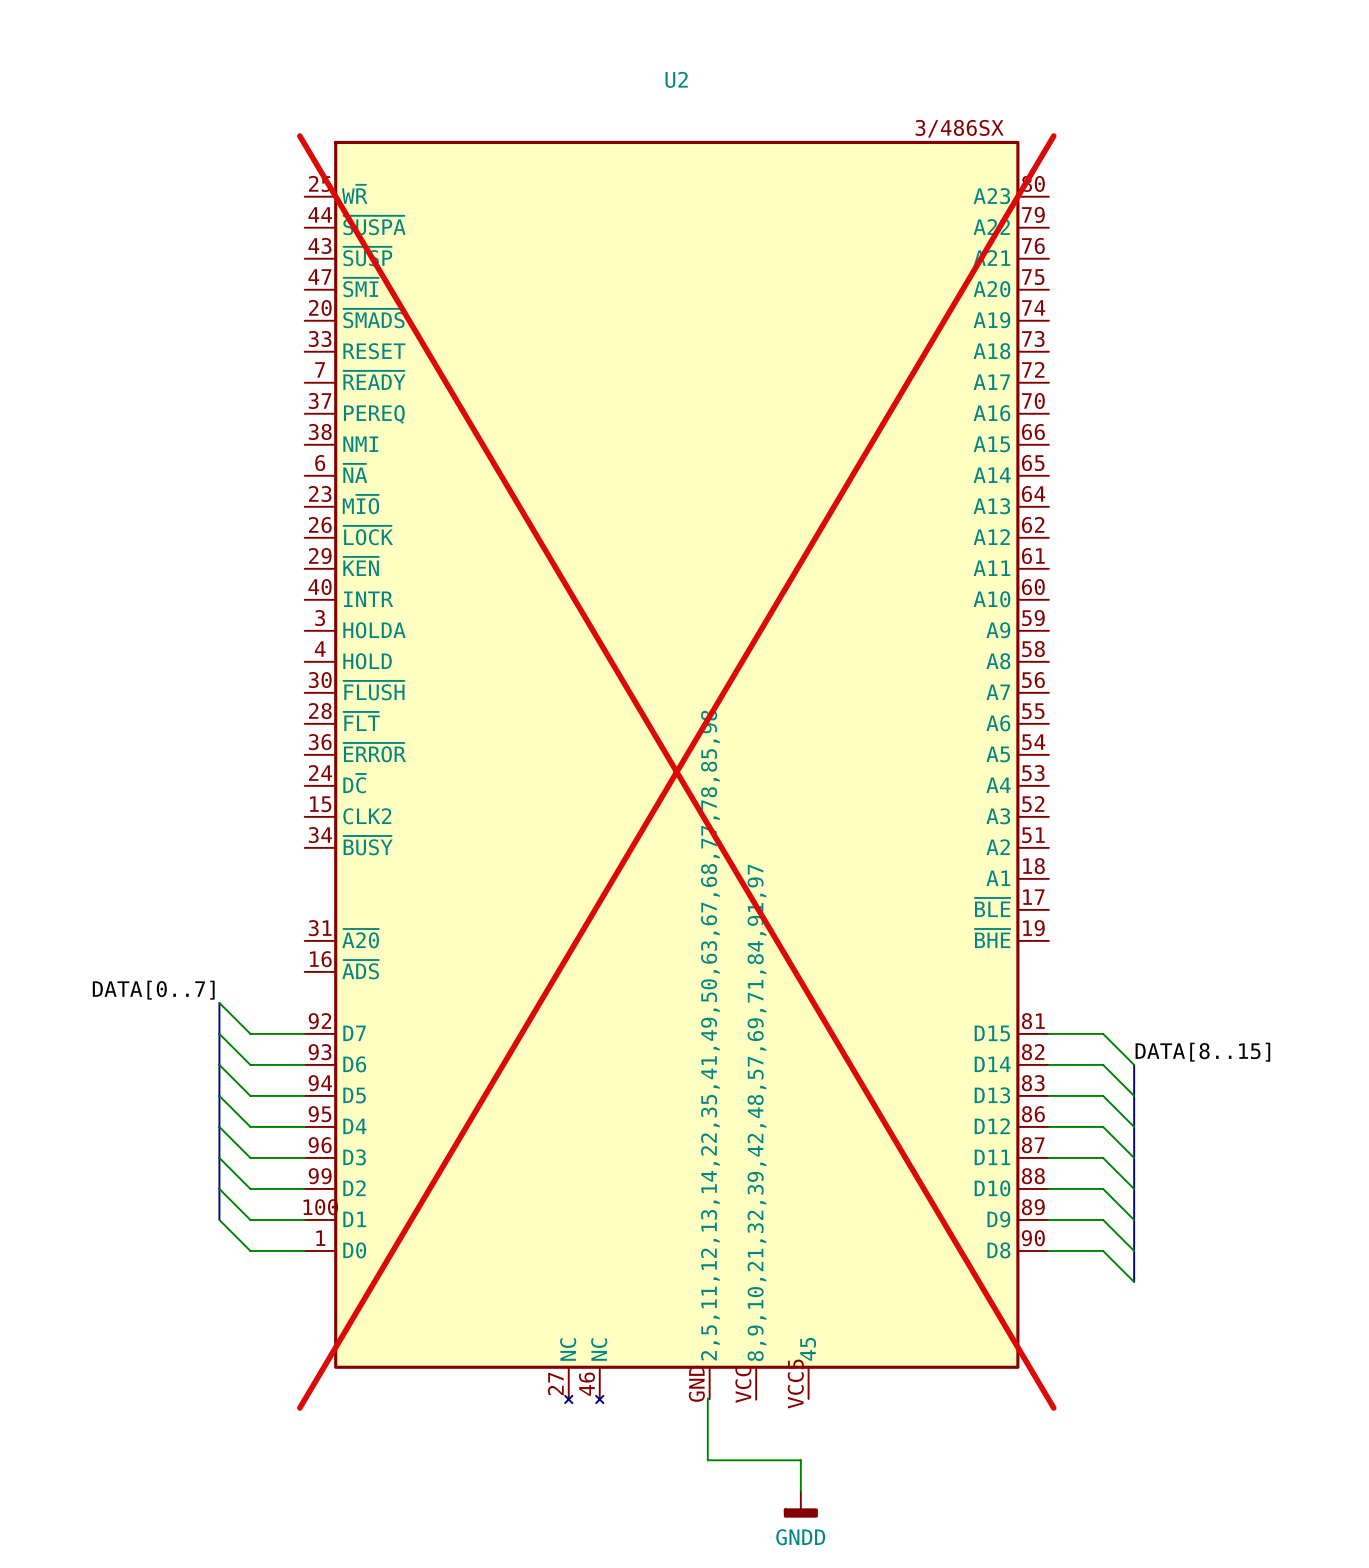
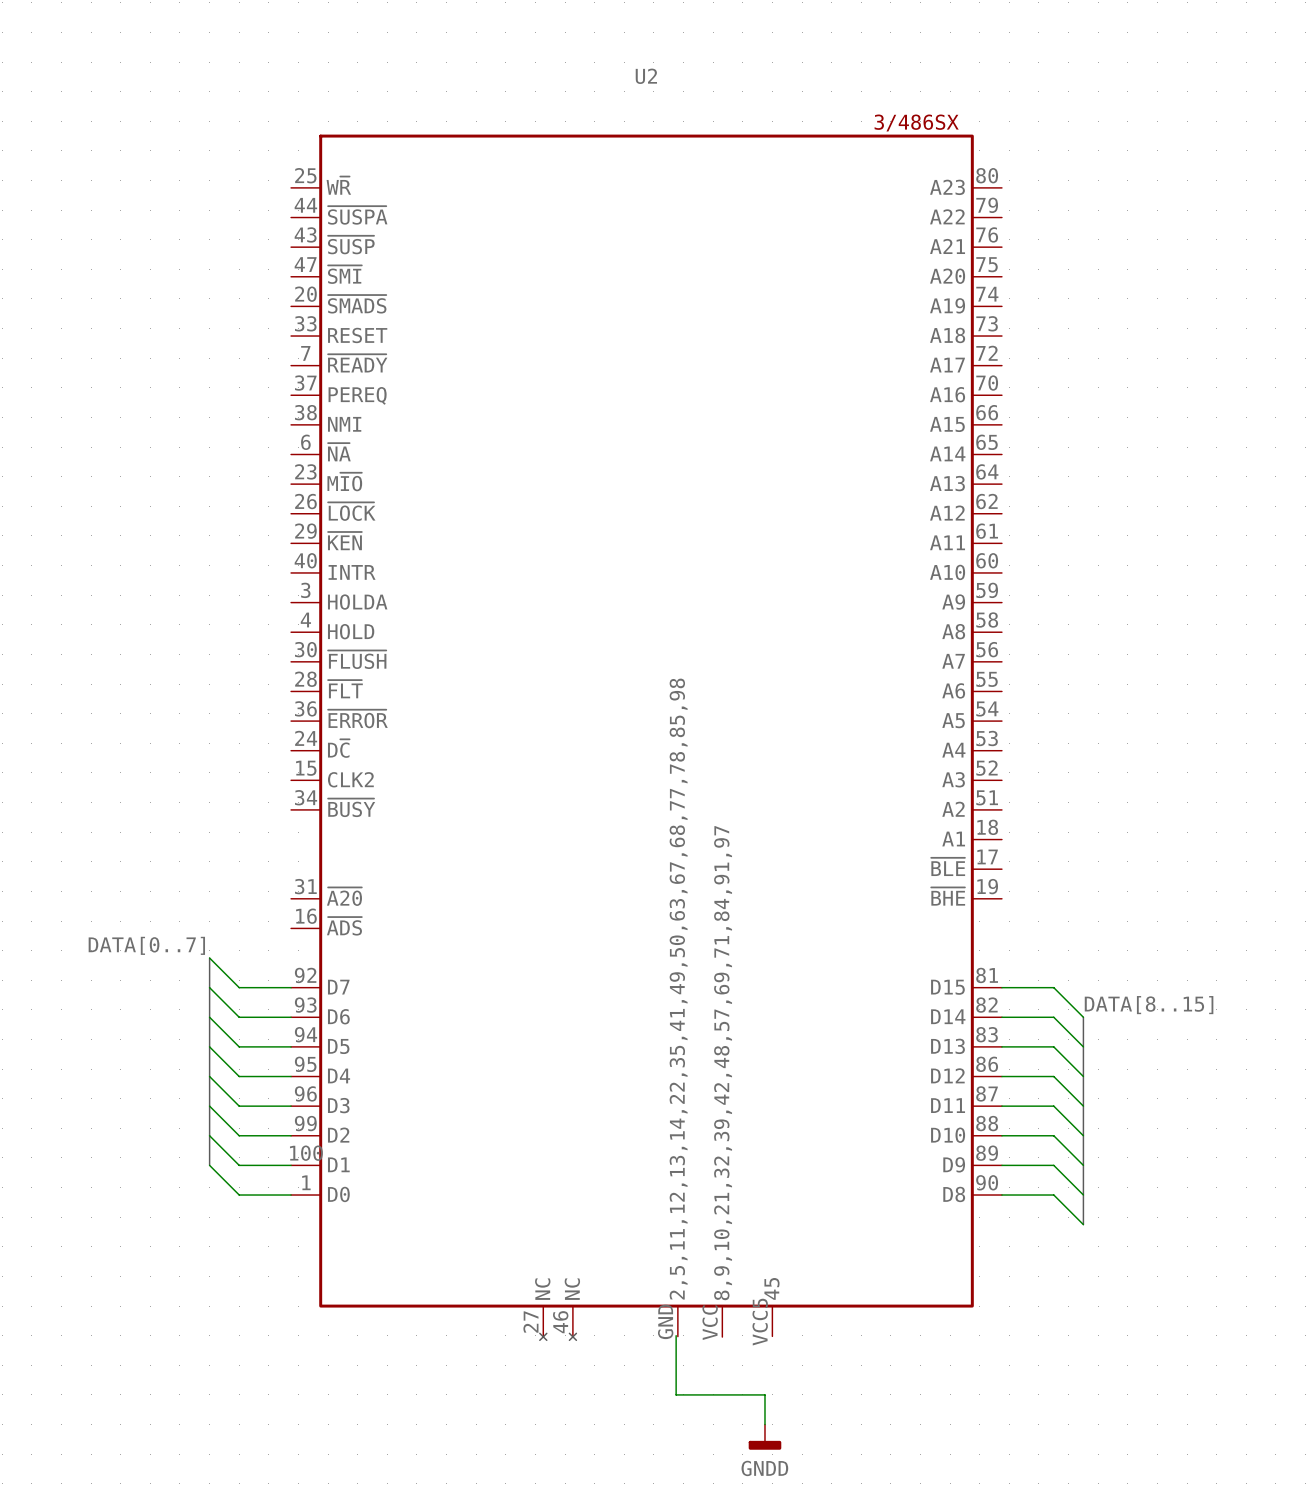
U2 do-not-place cross: (676, 772) -> none

